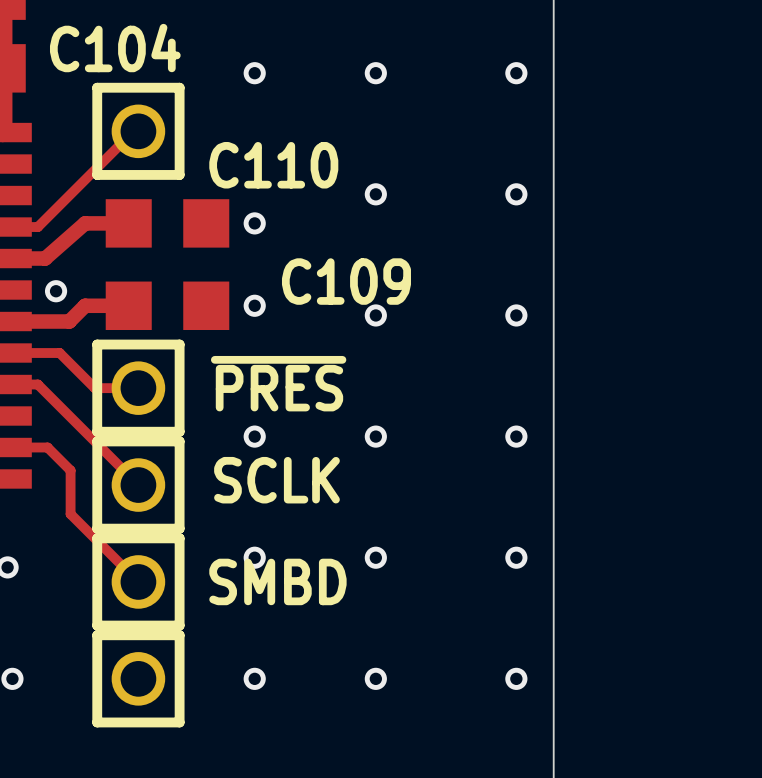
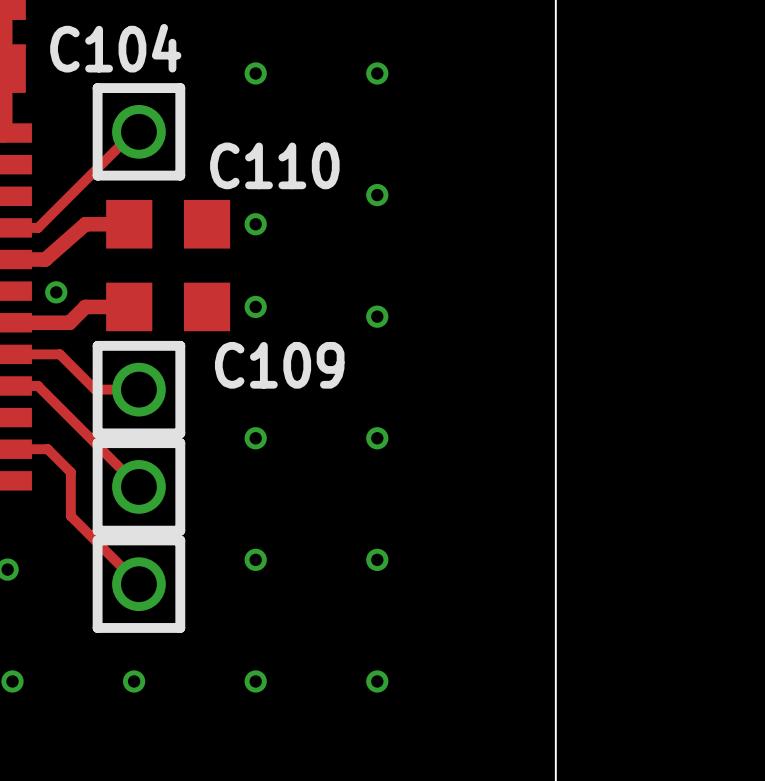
via: (516, 73) -> none
via: (516, 194) -> none
C109 name position: C109 (346, 281) -> C109 (279, 365)
via: (516, 315) -> none
text: ~{PRES} (278, 383) -> none
via: (516, 436) -> none
text: SCLK (276, 480) -> none
via: (516, 557) -> none
text: SMBD (277, 581) -> none
via: none -> (134, 681)
part: (138, 678) -> none
via: (516, 678) -> none

